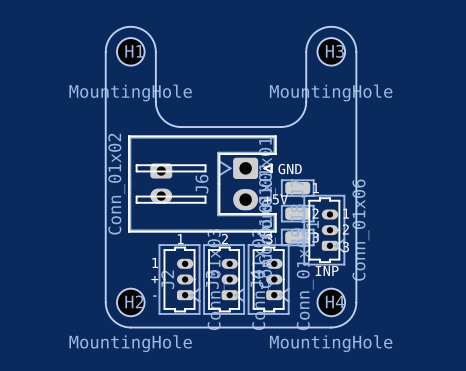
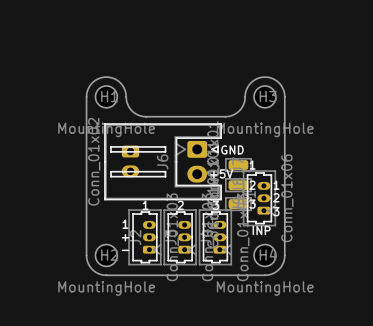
H1 position: (130, 51) -> (106, 96)
H3 position: (331, 51) -> (264, 96)
board edge: (105, 101) (106, 45) (115, 31) (130, 26) (146, 31) (155, 45) (155, 101) -> (86, 96) (88, 89) (92, 82) (98, 78) (106, 77) (113, 78) (120, 82) (124, 89) (126, 96)
board edge: (306, 101) (307, 45) (316, 31) (331, 26) (346, 31) (355, 45) (356, 101) -> (245, 96) (246, 89) (250, 82) (257, 78) (264, 77) (272, 78) (278, 82) (283, 89) (284, 96)

